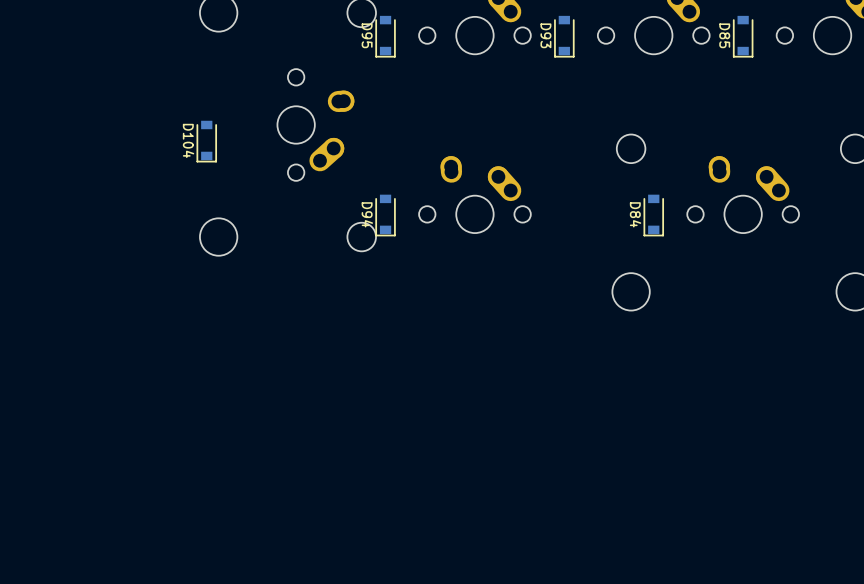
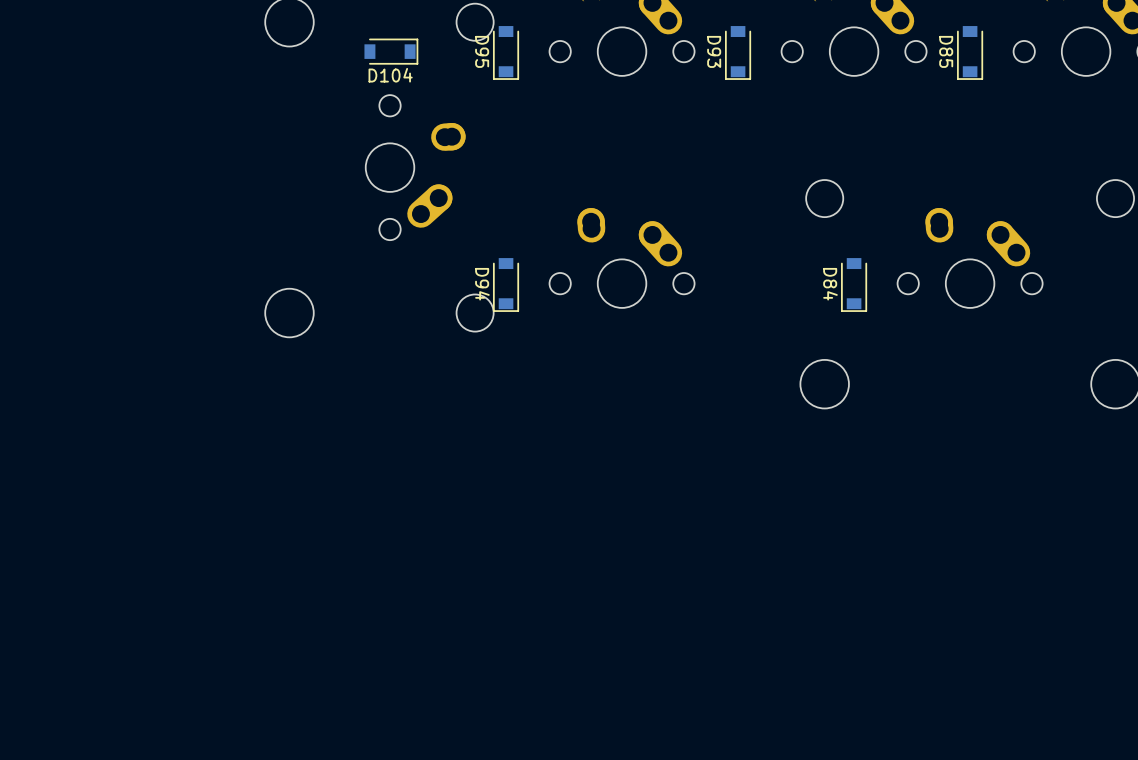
D104 rotation: 0° (206, 141) -> 90° counterclockwise (391, 51)
D104 position: (206, 141) -> (391, 51)

